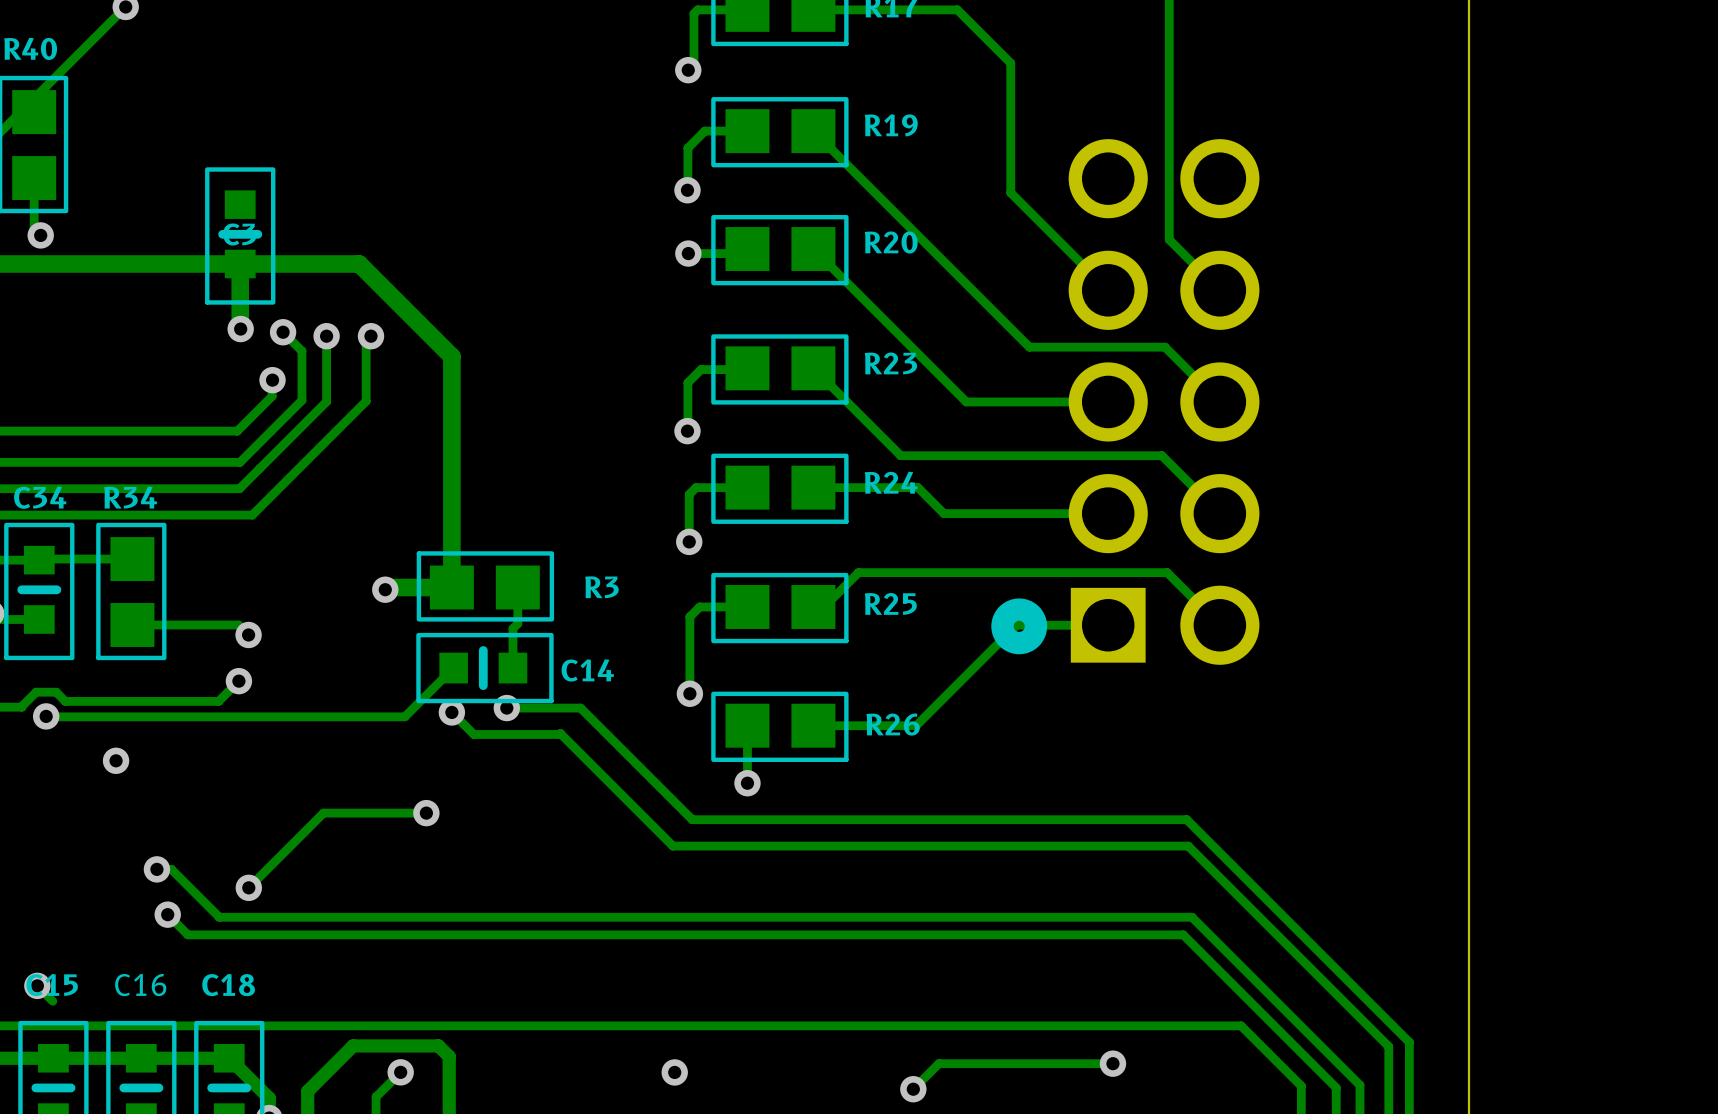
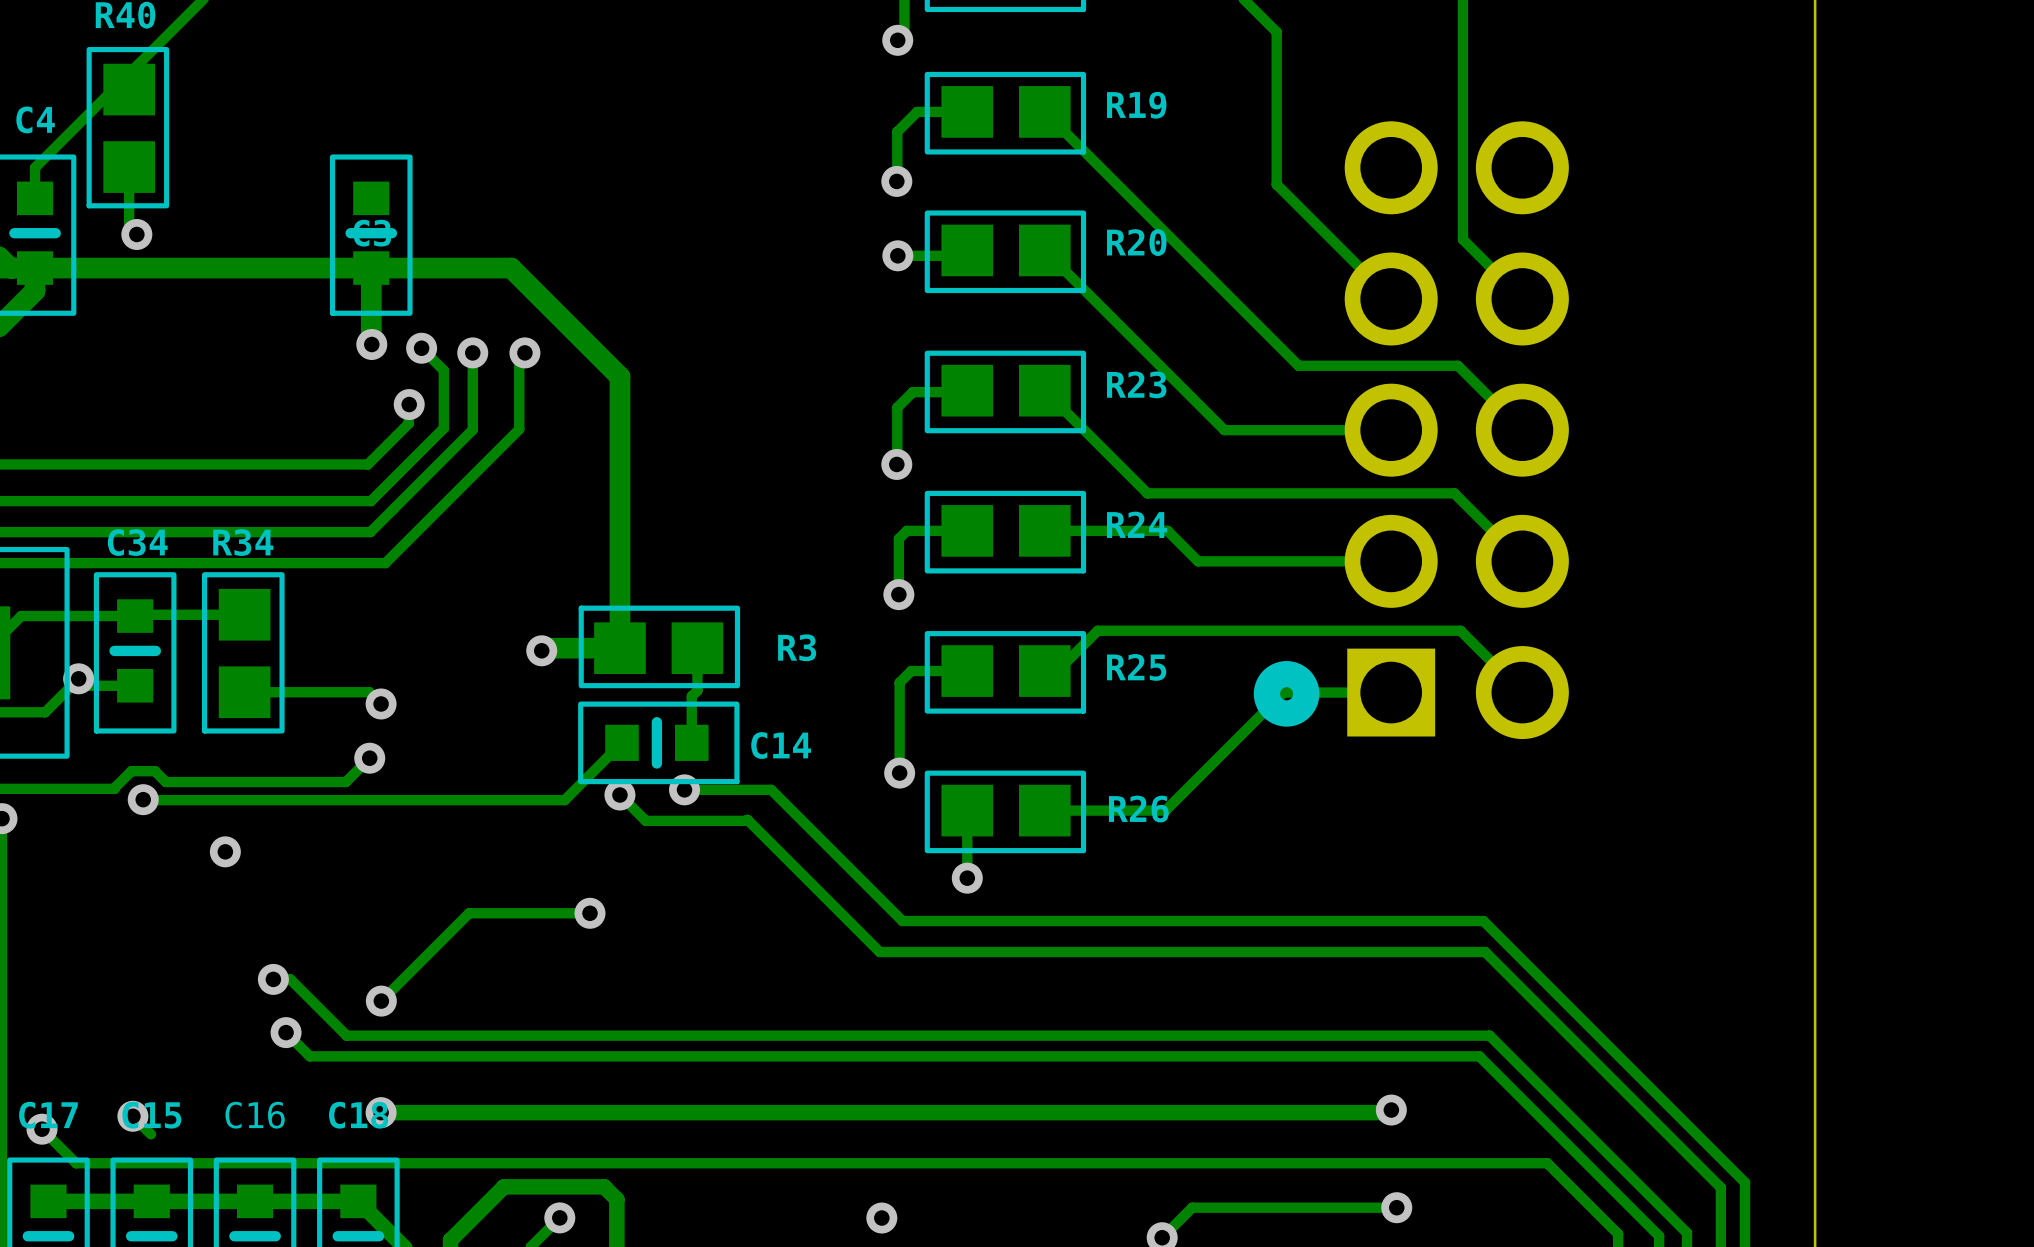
track: none -> (1391, 1110) (1388, 1112) (381, 1112)
via: none -> (1391, 1110)
via: none -> (381, 1112)

